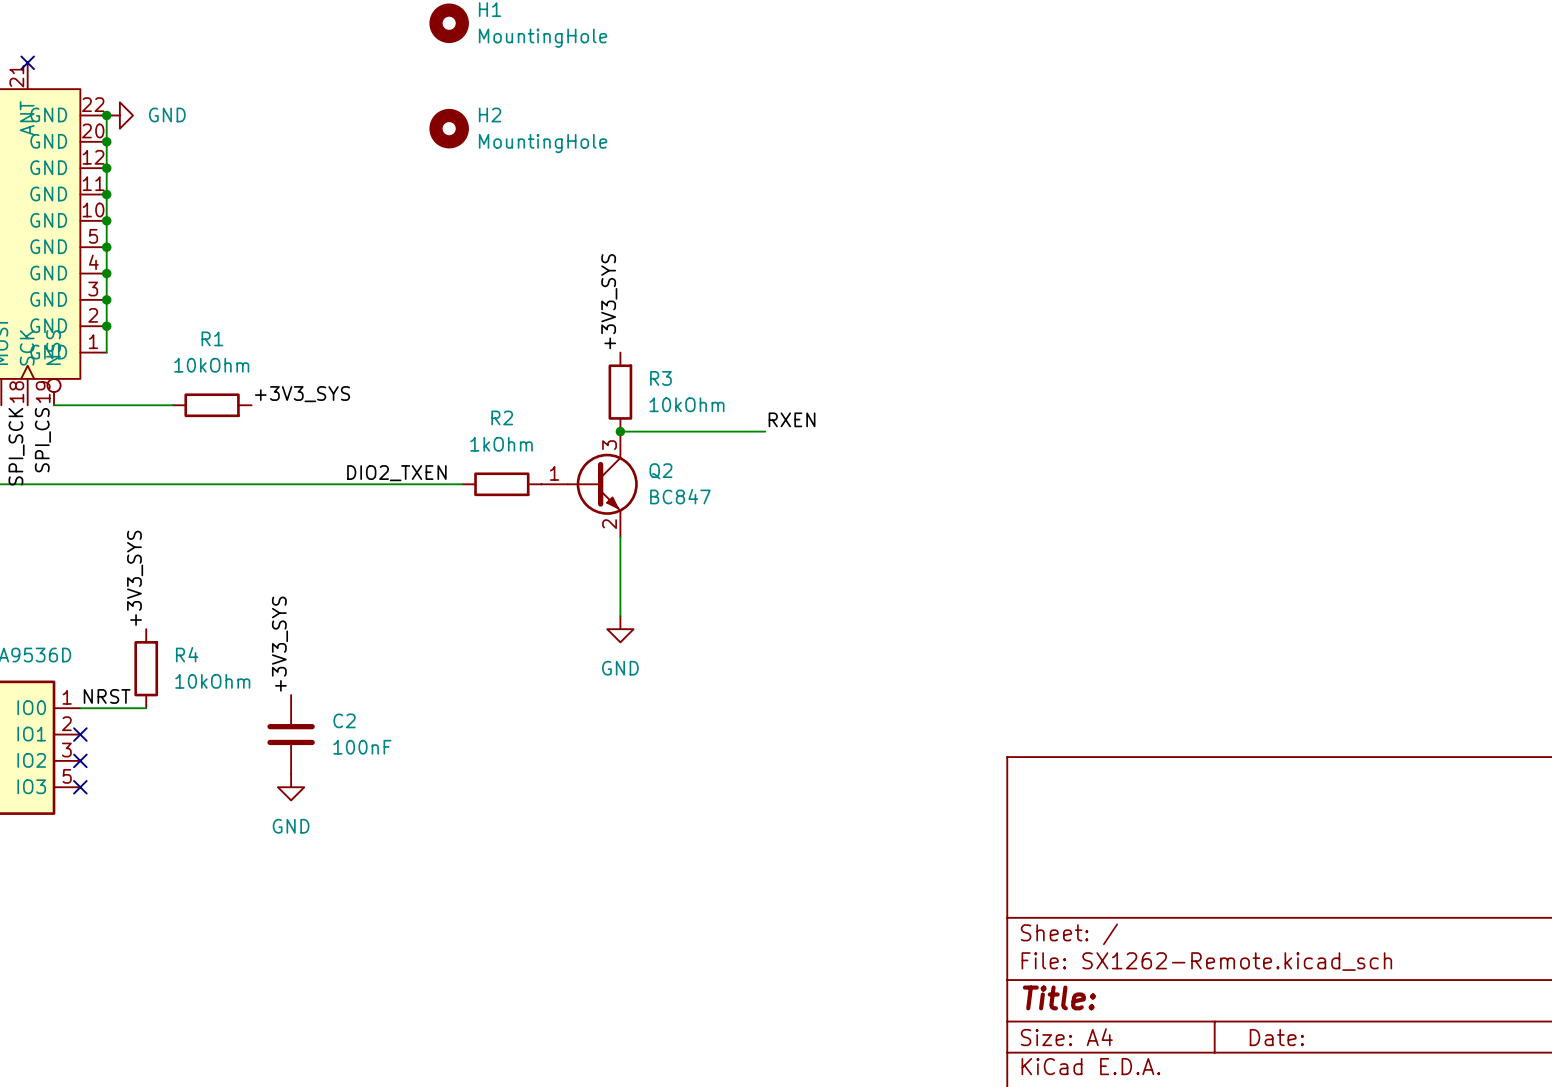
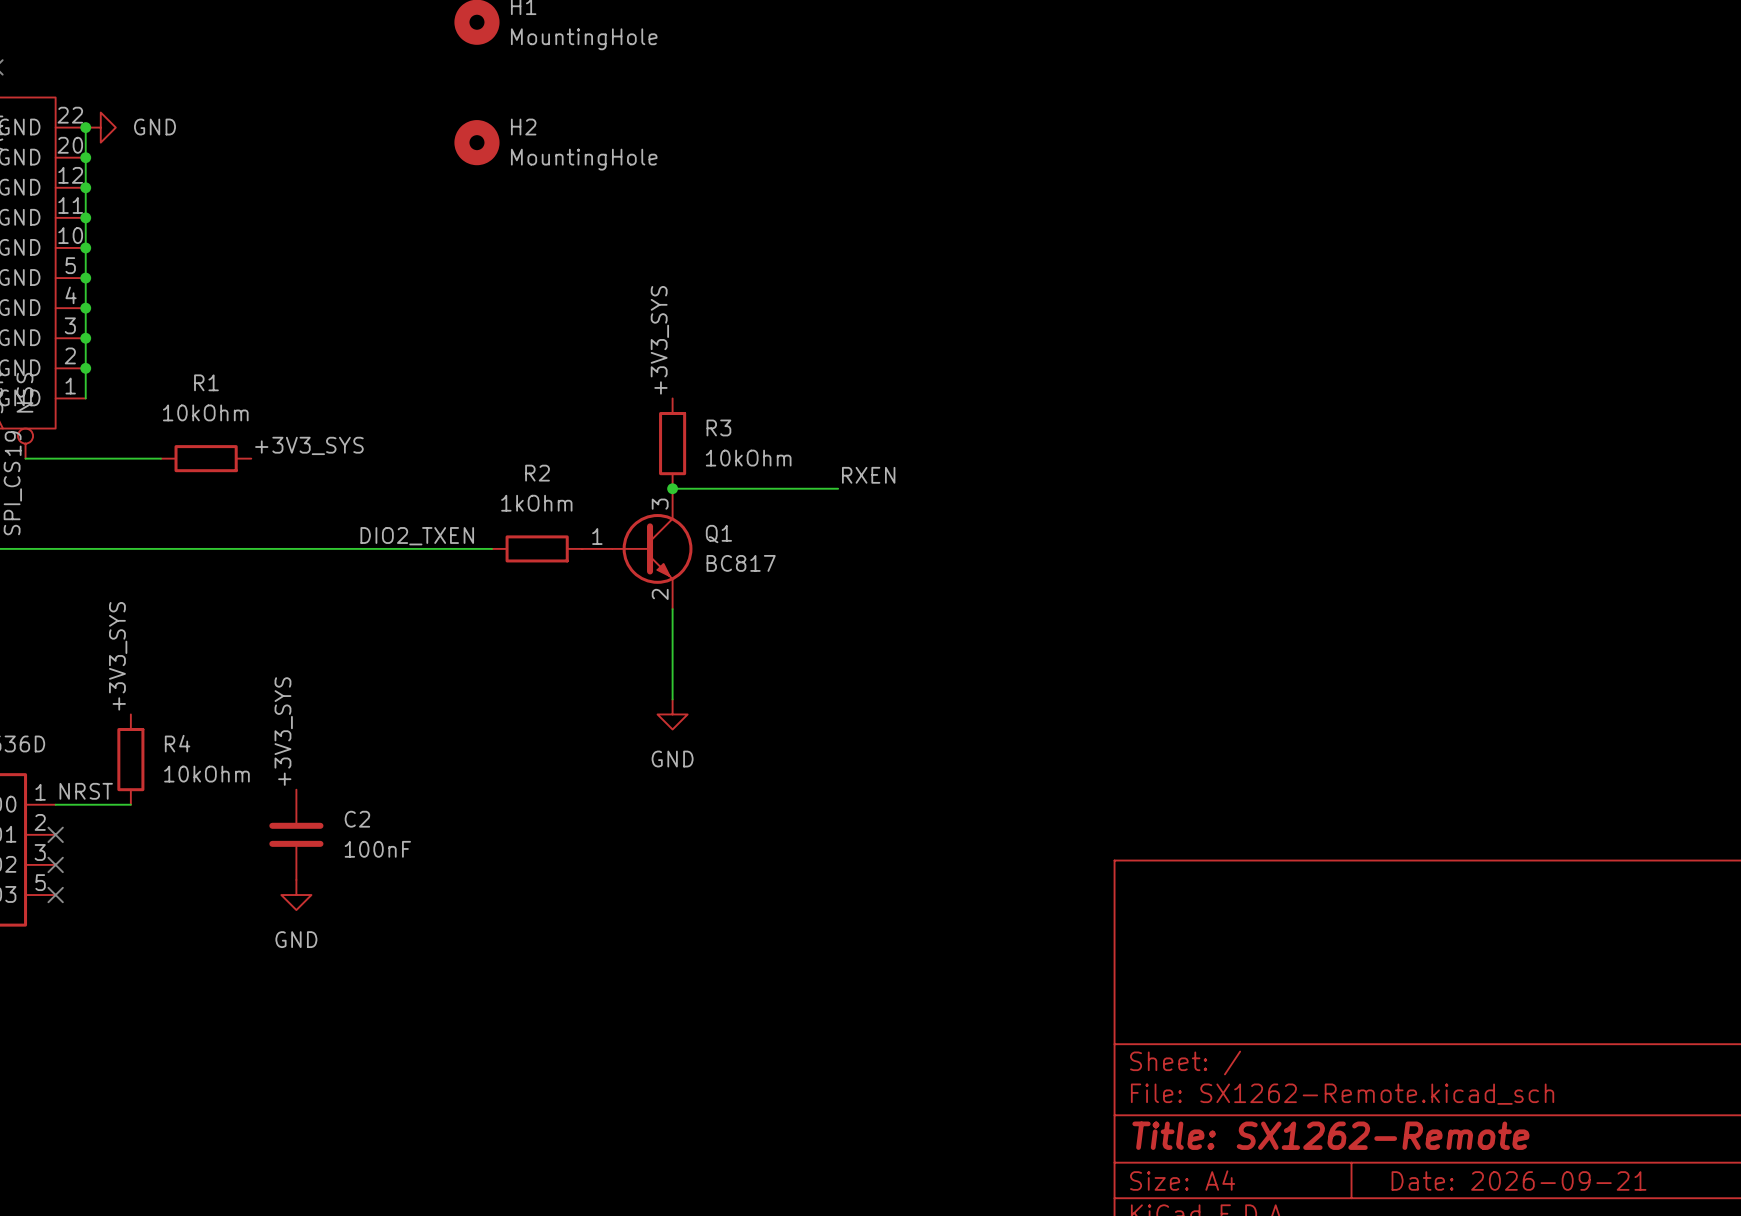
Q2 name: Q2 (660, 471) -> Q1 (718, 534)
Q2 value: BC847 (680, 496) -> BC817 (741, 563)
title block: Title: (1059, 997) -> Title: SX1262-Remote (1330, 1135)
title block: Date: (1276, 1037) -> Date: 2026-09-21 (1519, 1180)

